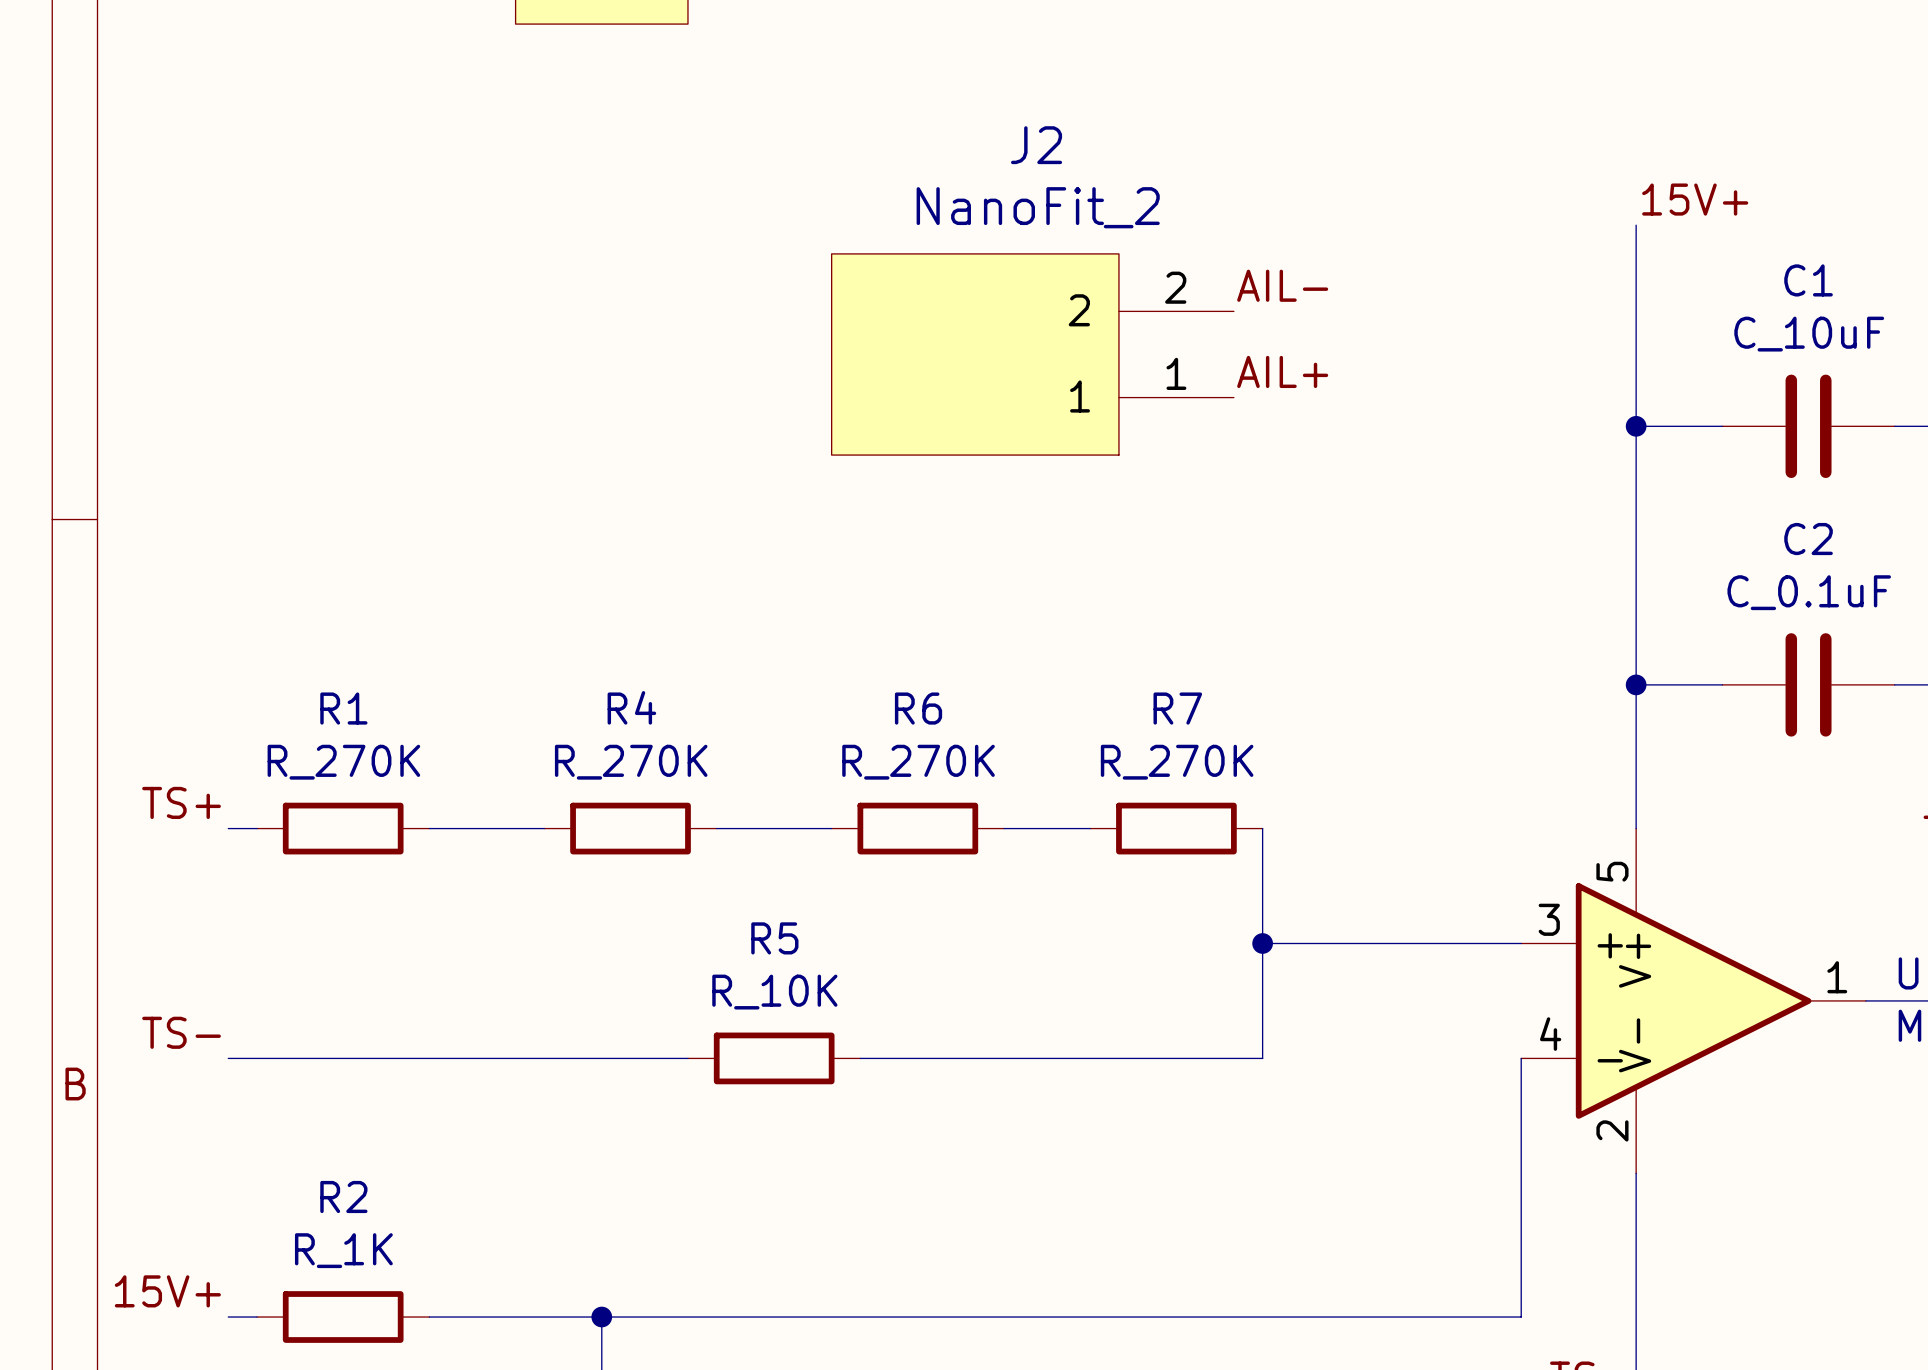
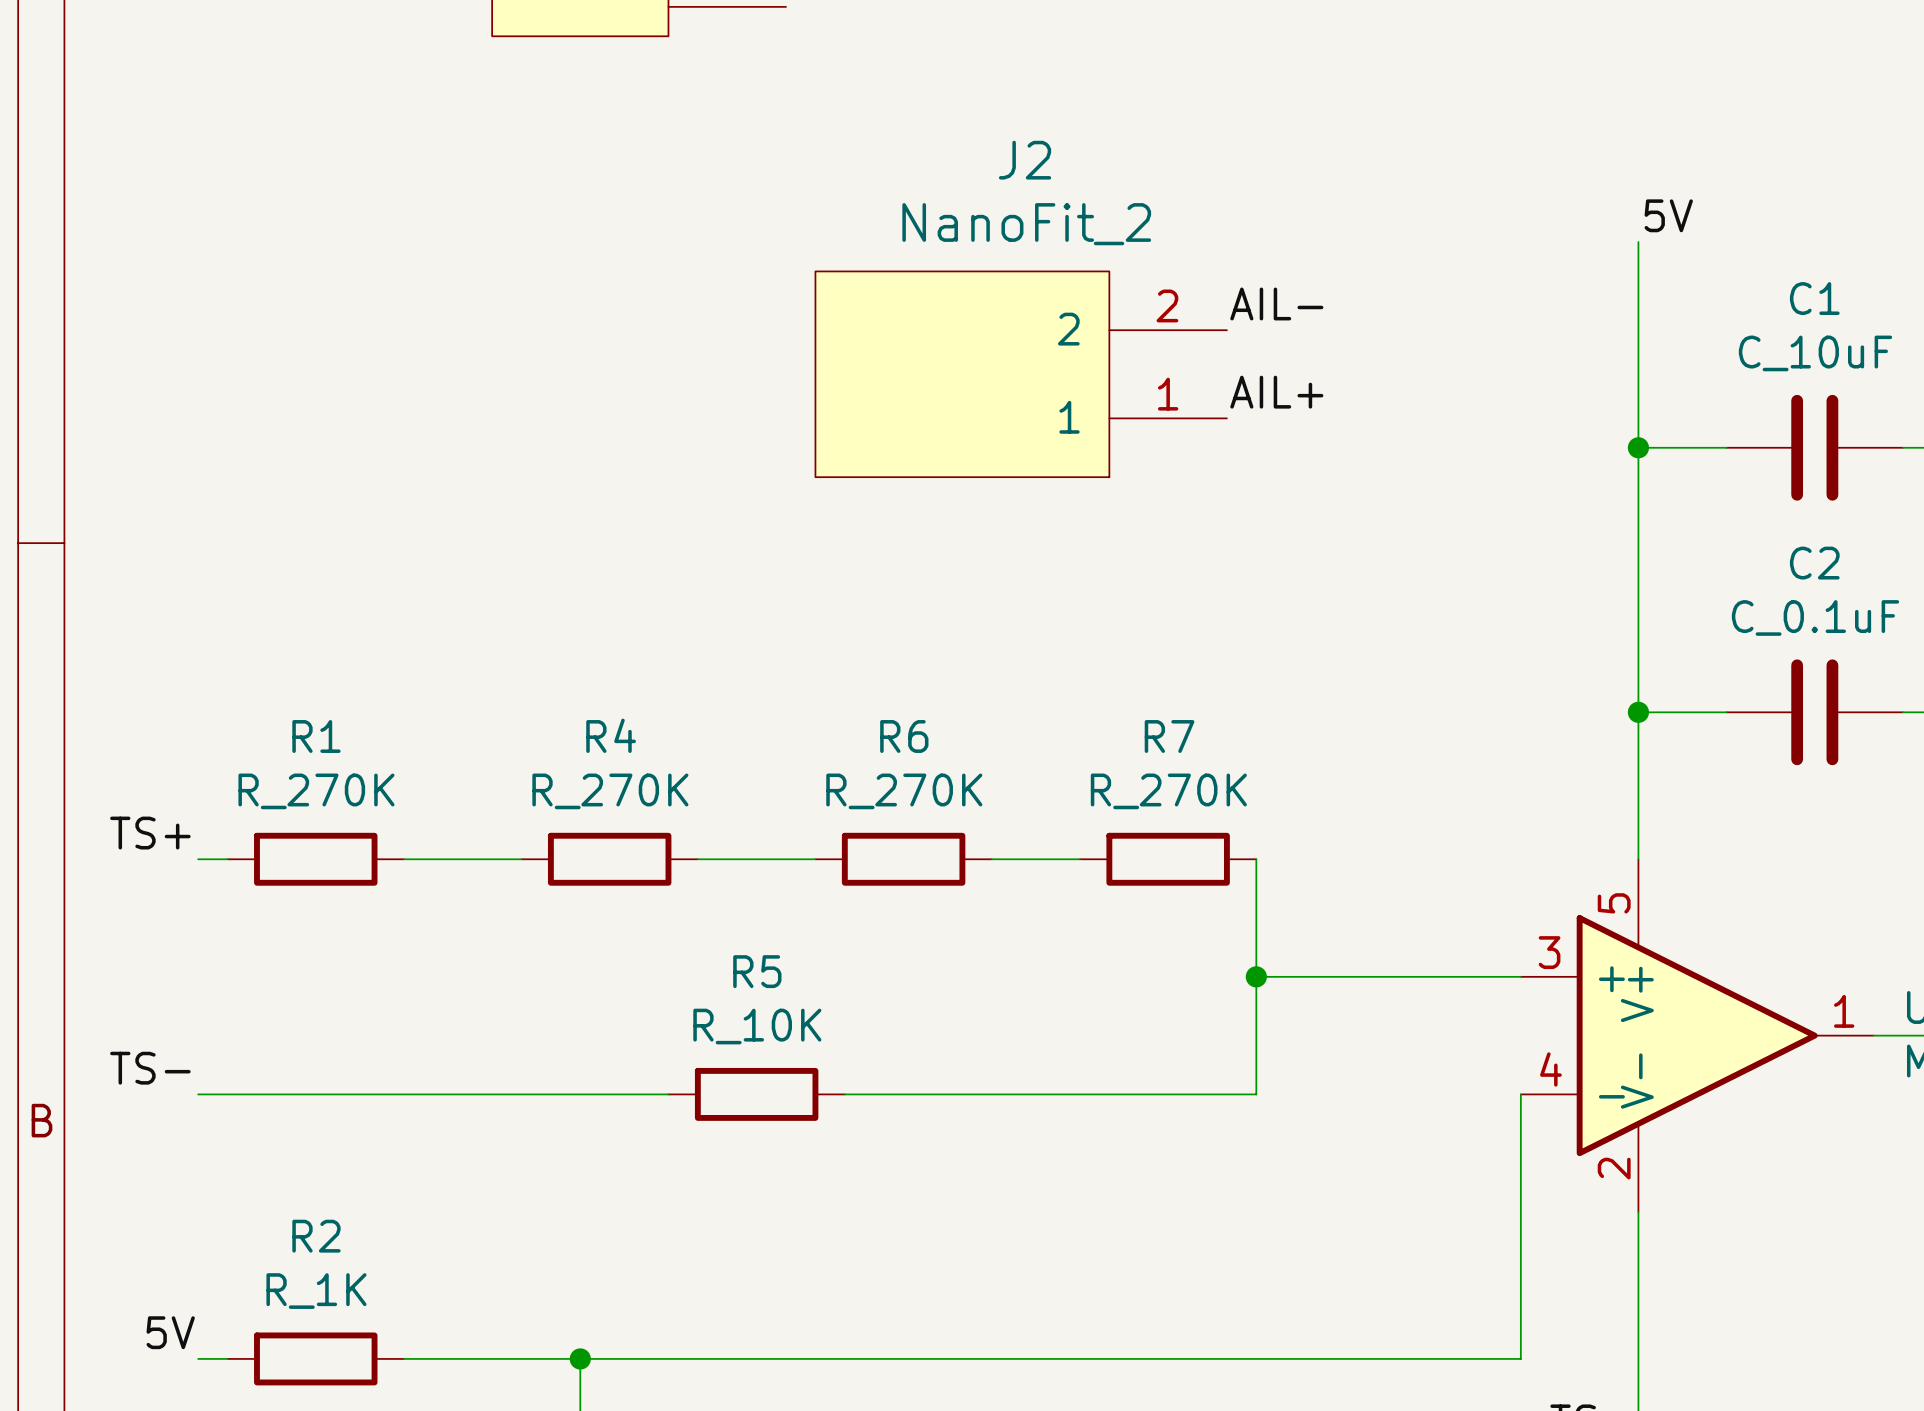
label: 15V+ (1695, 199) -> 5V (1668, 215)
label: 15V+ (167, 1291) -> 5V (170, 1332)

